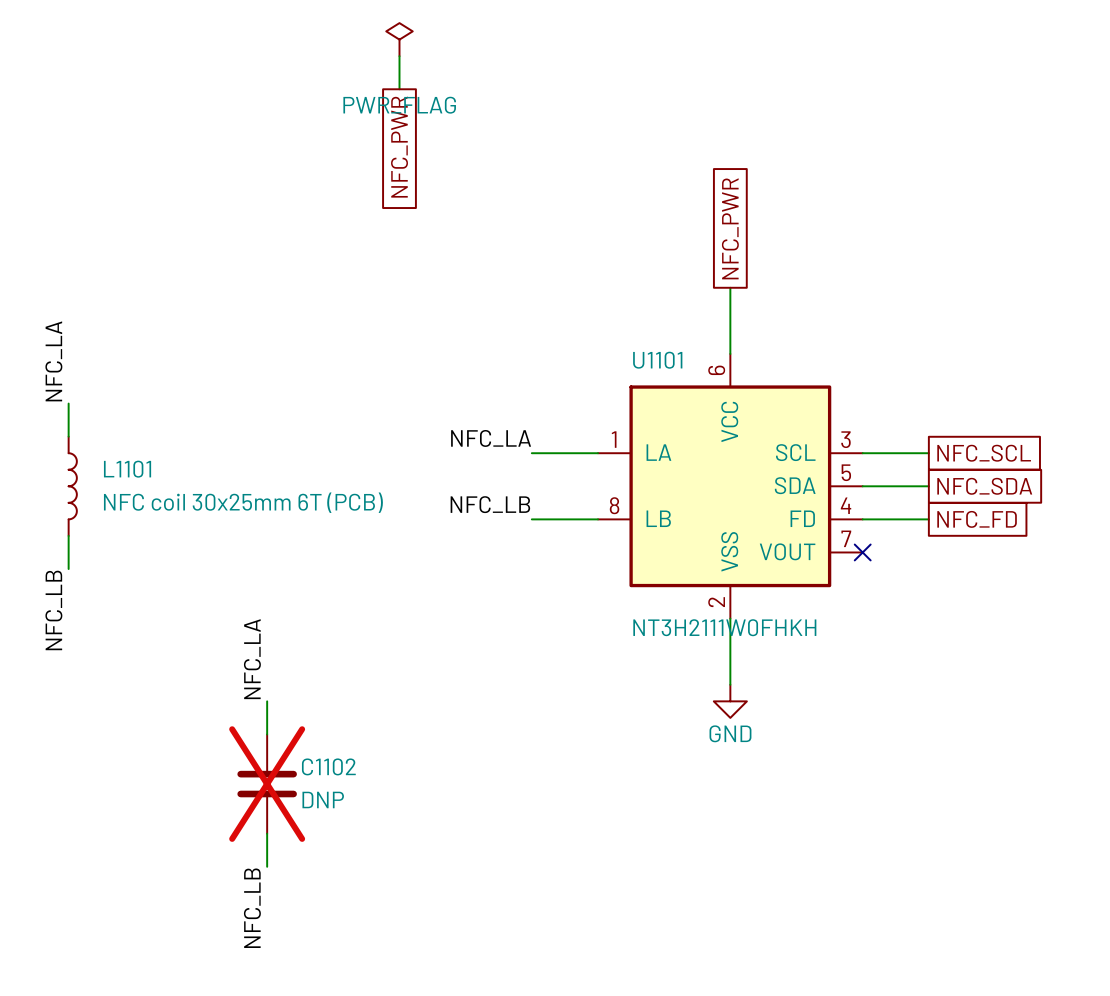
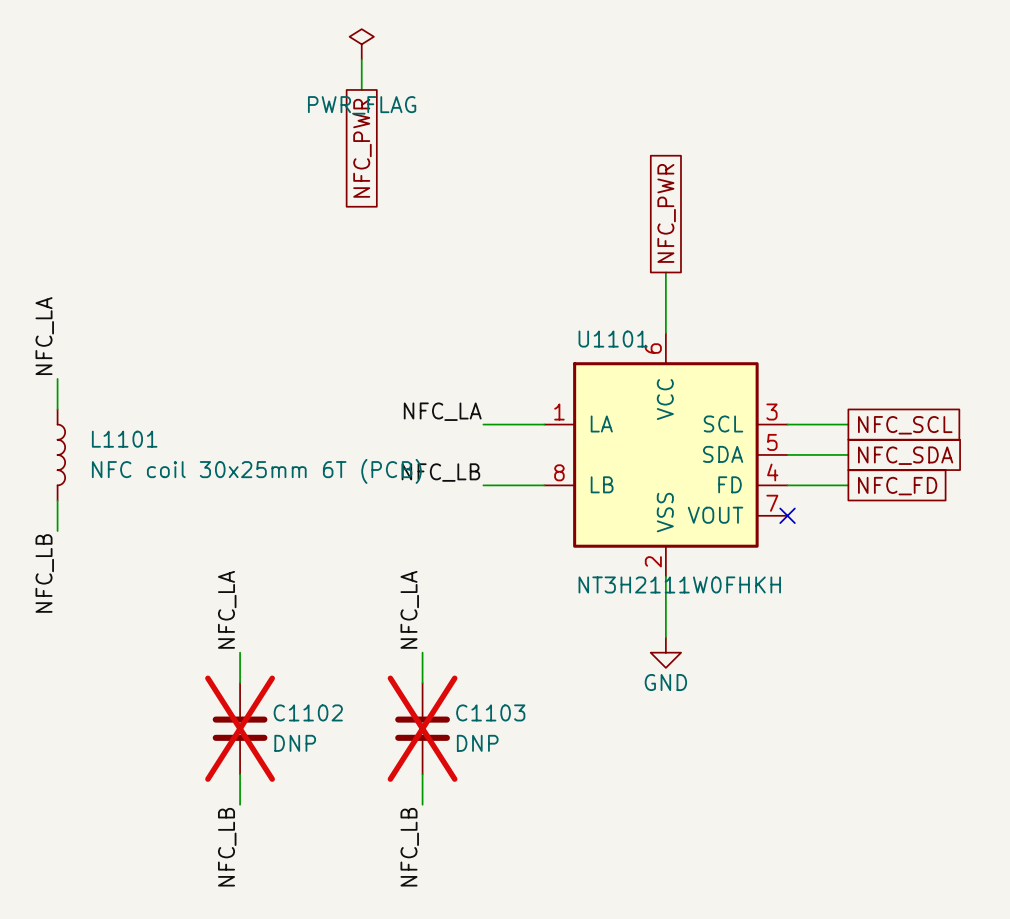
label: none -> NFC_LA (409, 609)
wire: none -> (422, 652) (422, 683)
C1103: none -> DNP (422, 728)
wire: none -> (422, 774) (422, 804)
label: none -> NFC_LB (409, 847)

